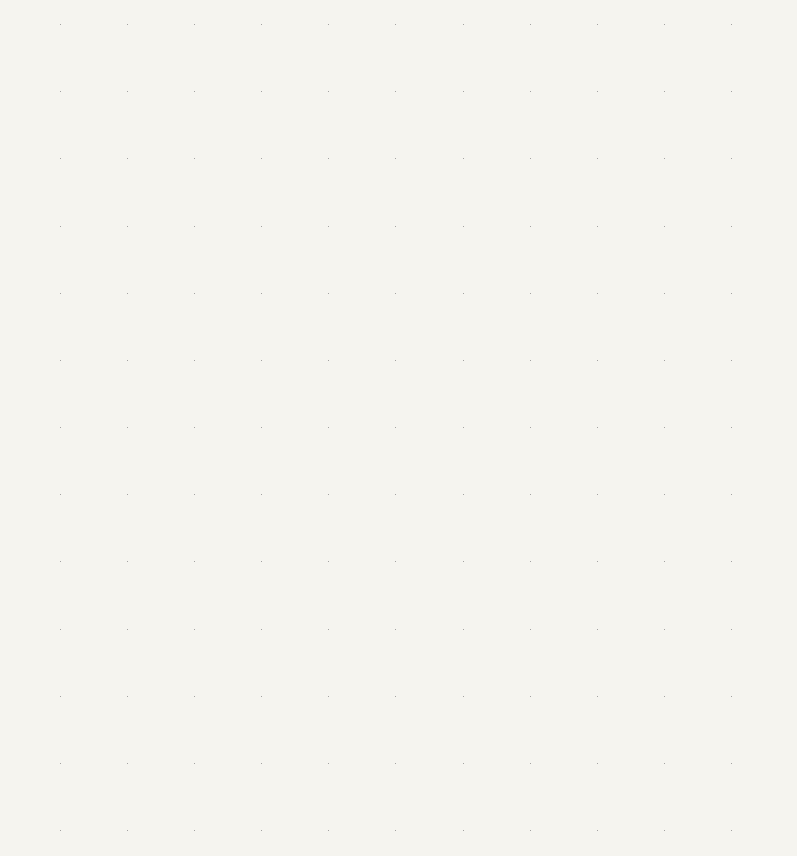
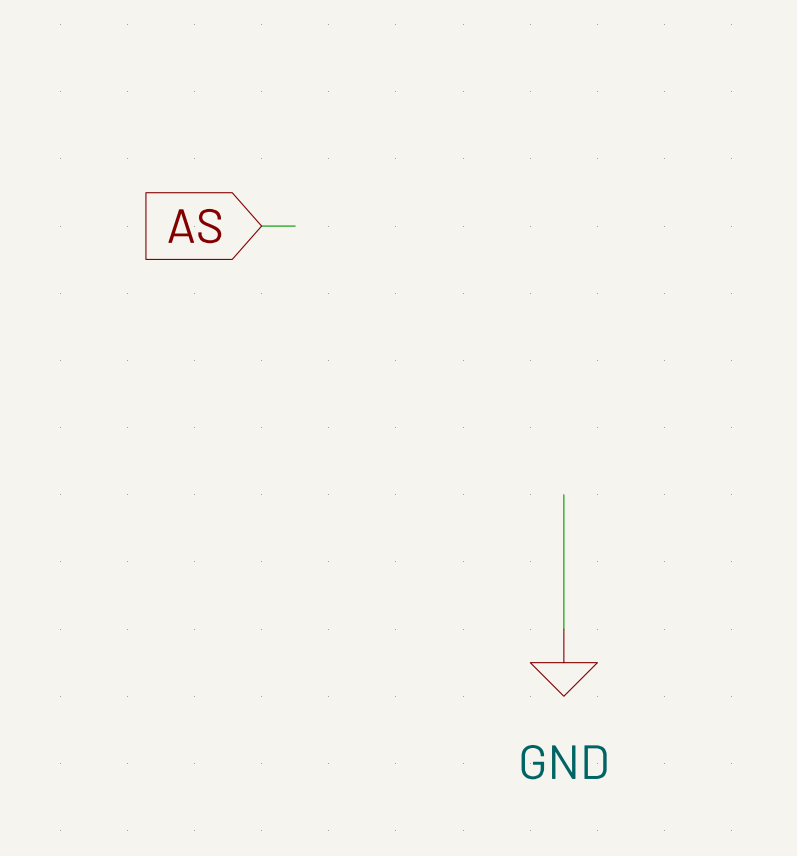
global label: none -> AS (194, 226)
wire: none -> (261, 226) (295, 226)
wire: none -> (563, 494) (563, 629)
power symbol: none -> GND (563, 662)

